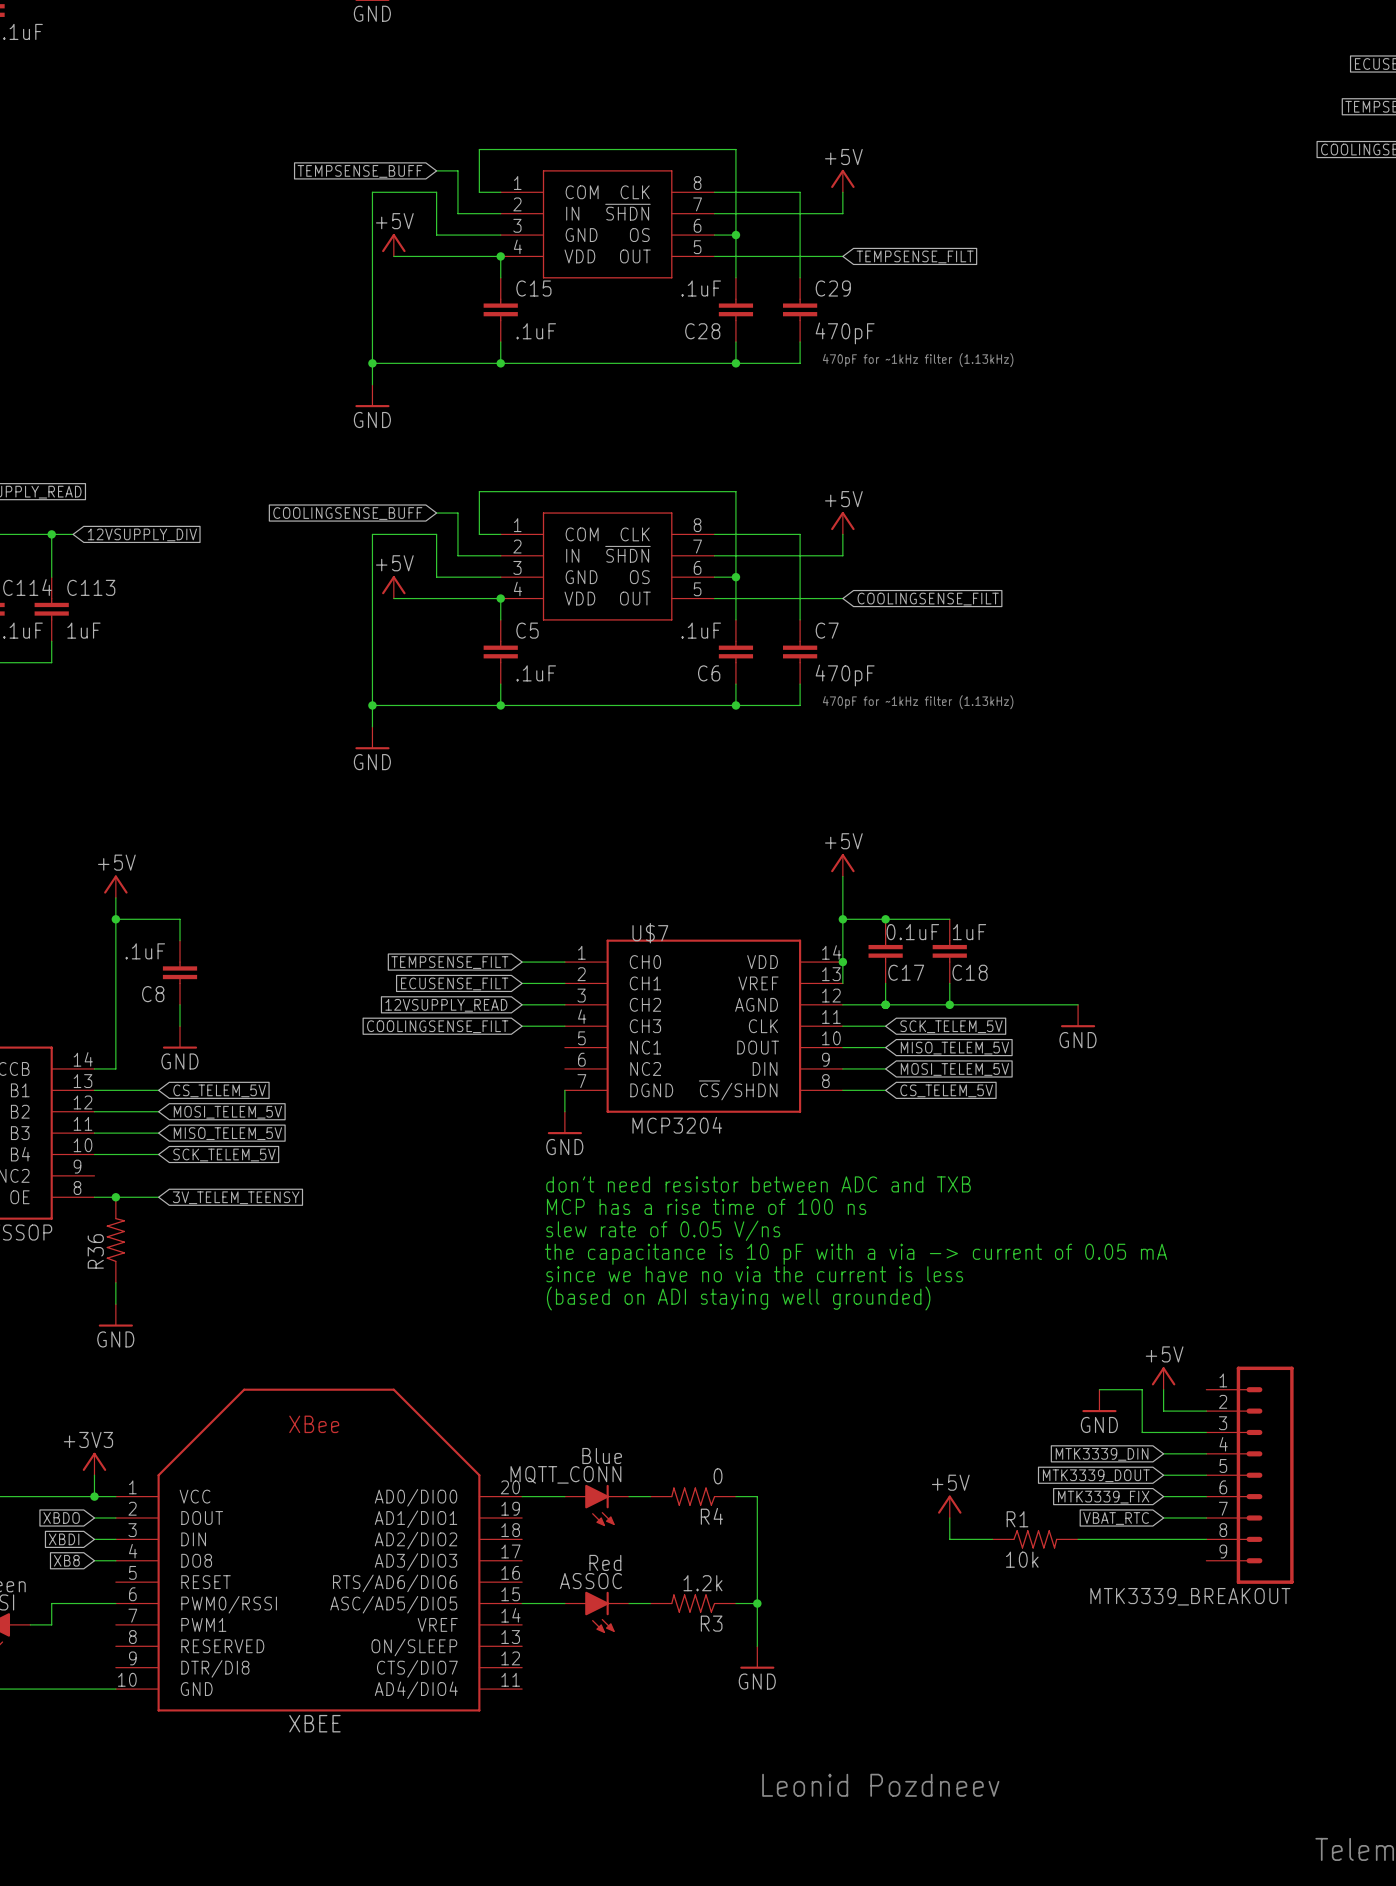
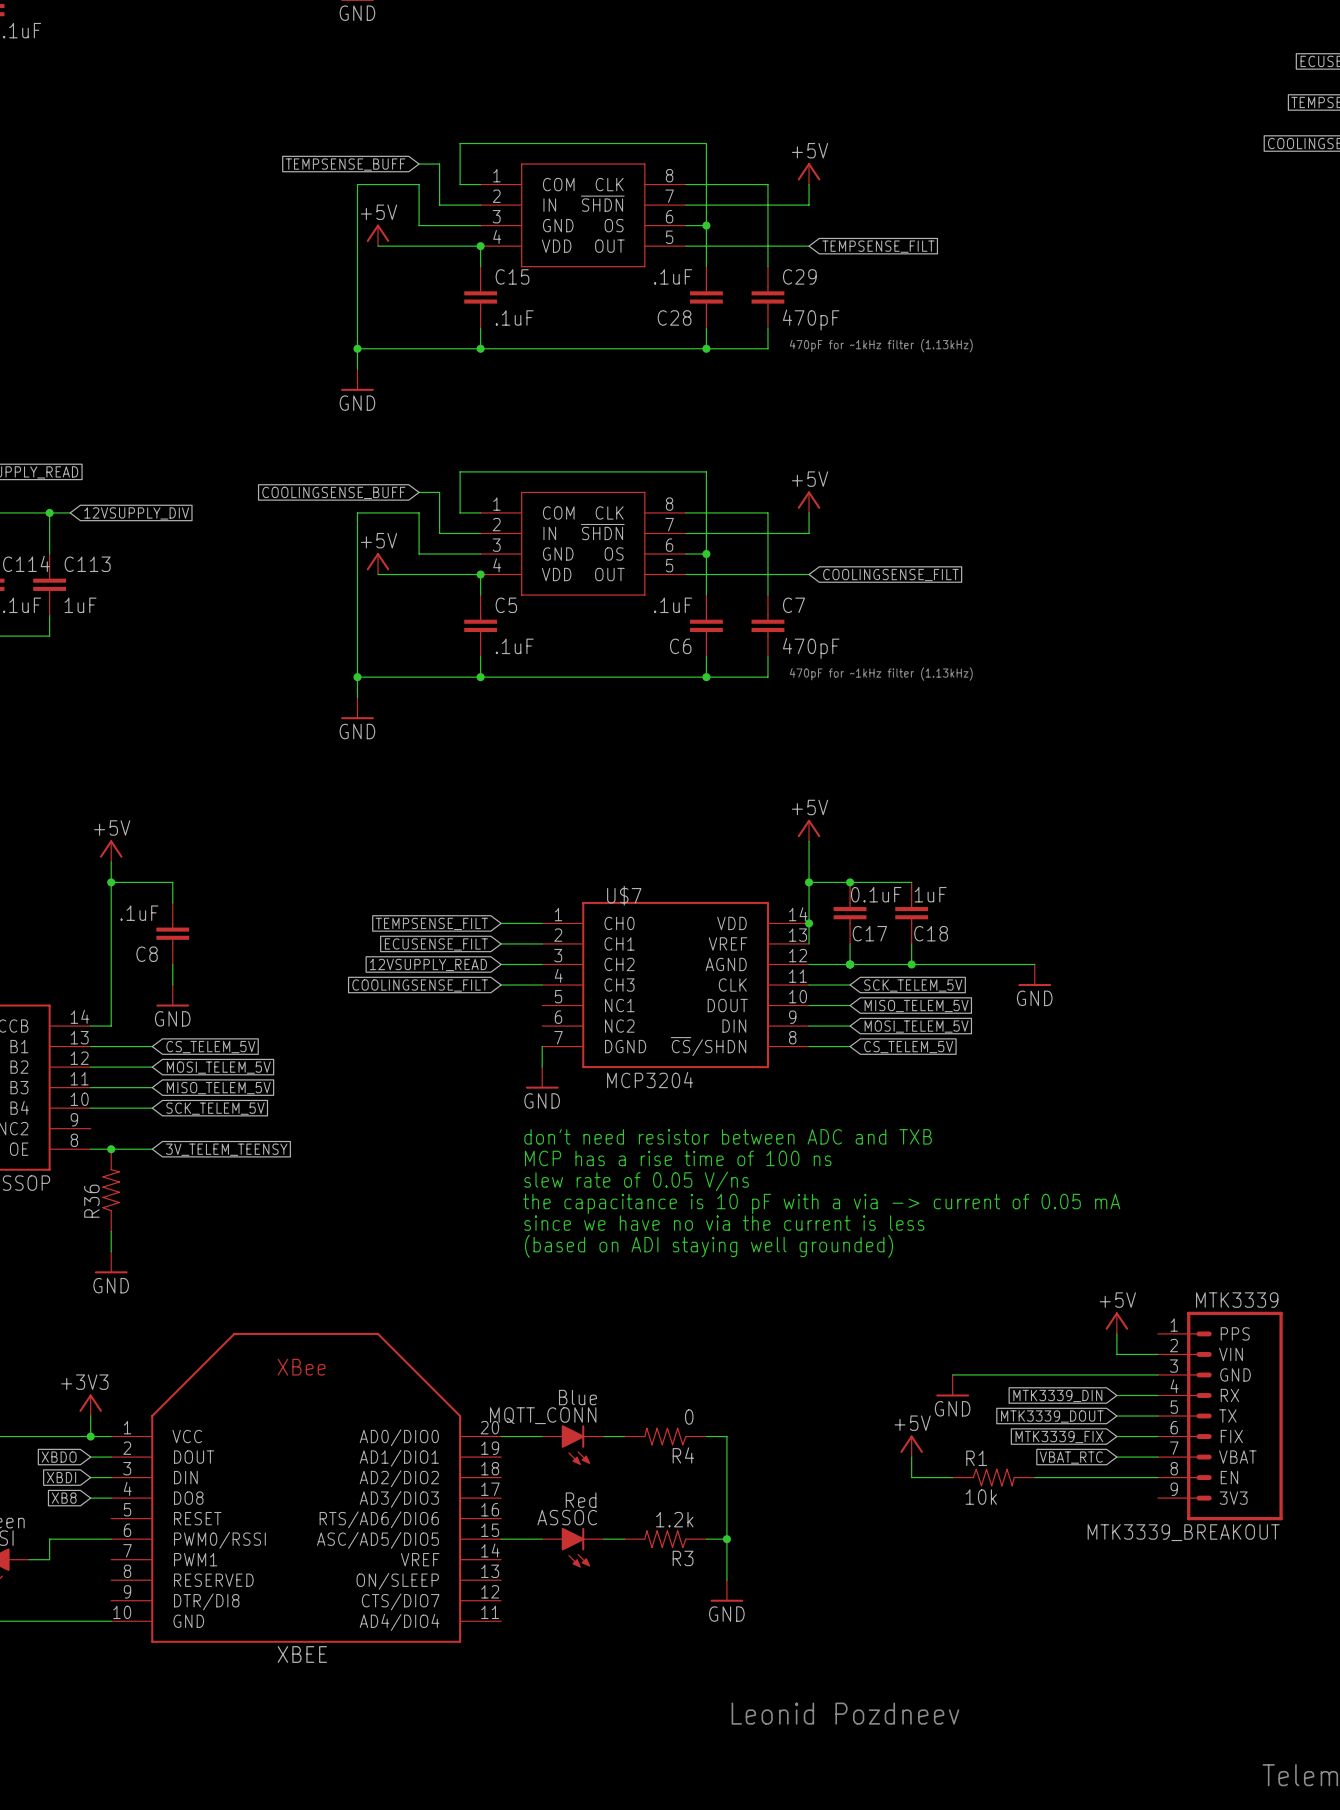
MTK3339_BREAKOUT value: none -> MTK3339 (1237, 1300)
MTK3339_BREAKOUT symbol: [1206, 1366, 1294, 1584] -> [1157, 1311, 1283, 1521]
wire: (1099, 1389) (1142, 1389) (1142, 1432) -> (952, 1374) (1096, 1374)
power symbol position: GND (1099, 1400) -> GND (952, 1385)
MTK3339_BREAKOUT name position: MTK3339_BREAKOUT (1190, 1596) -> MTK3339_BREAKOUT (1183, 1532)

